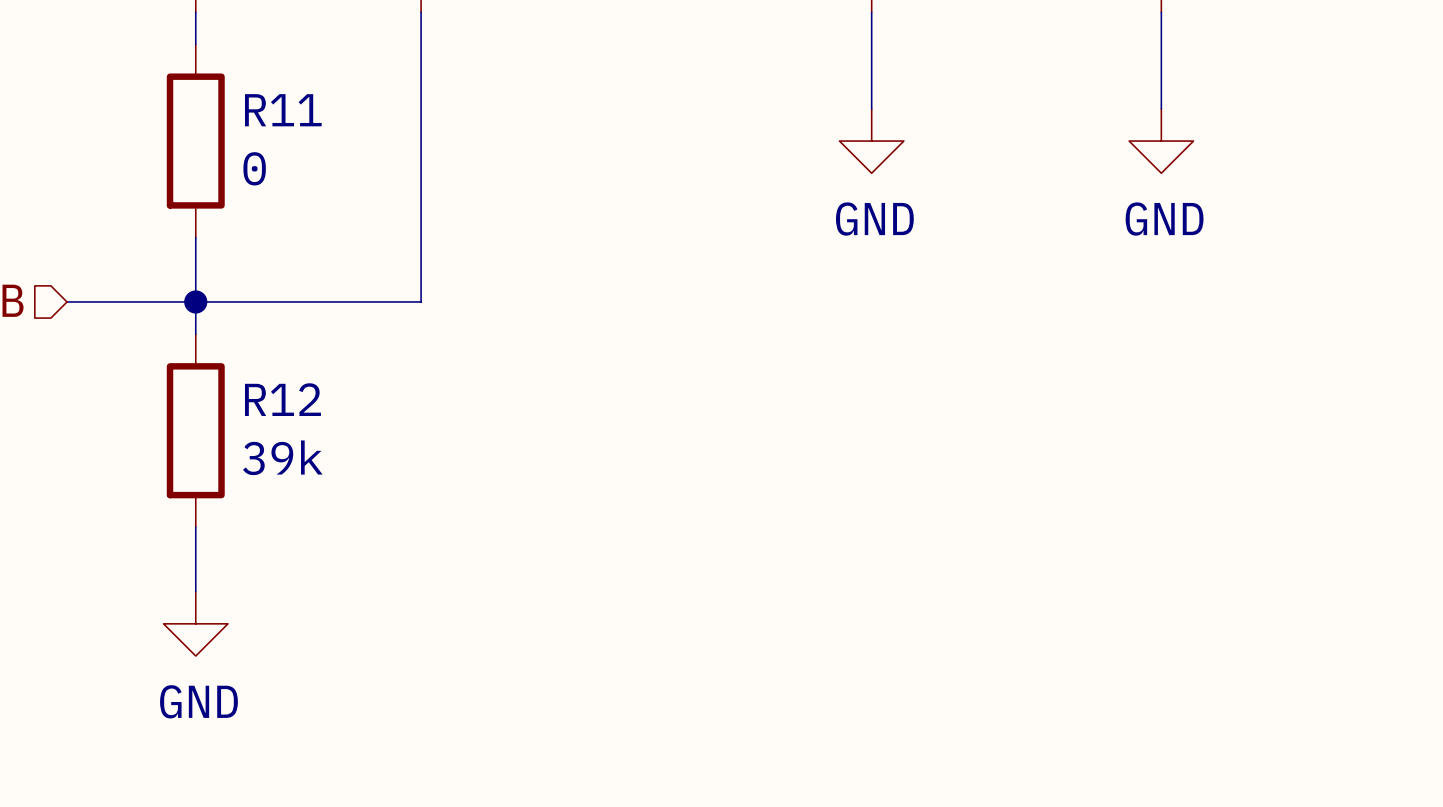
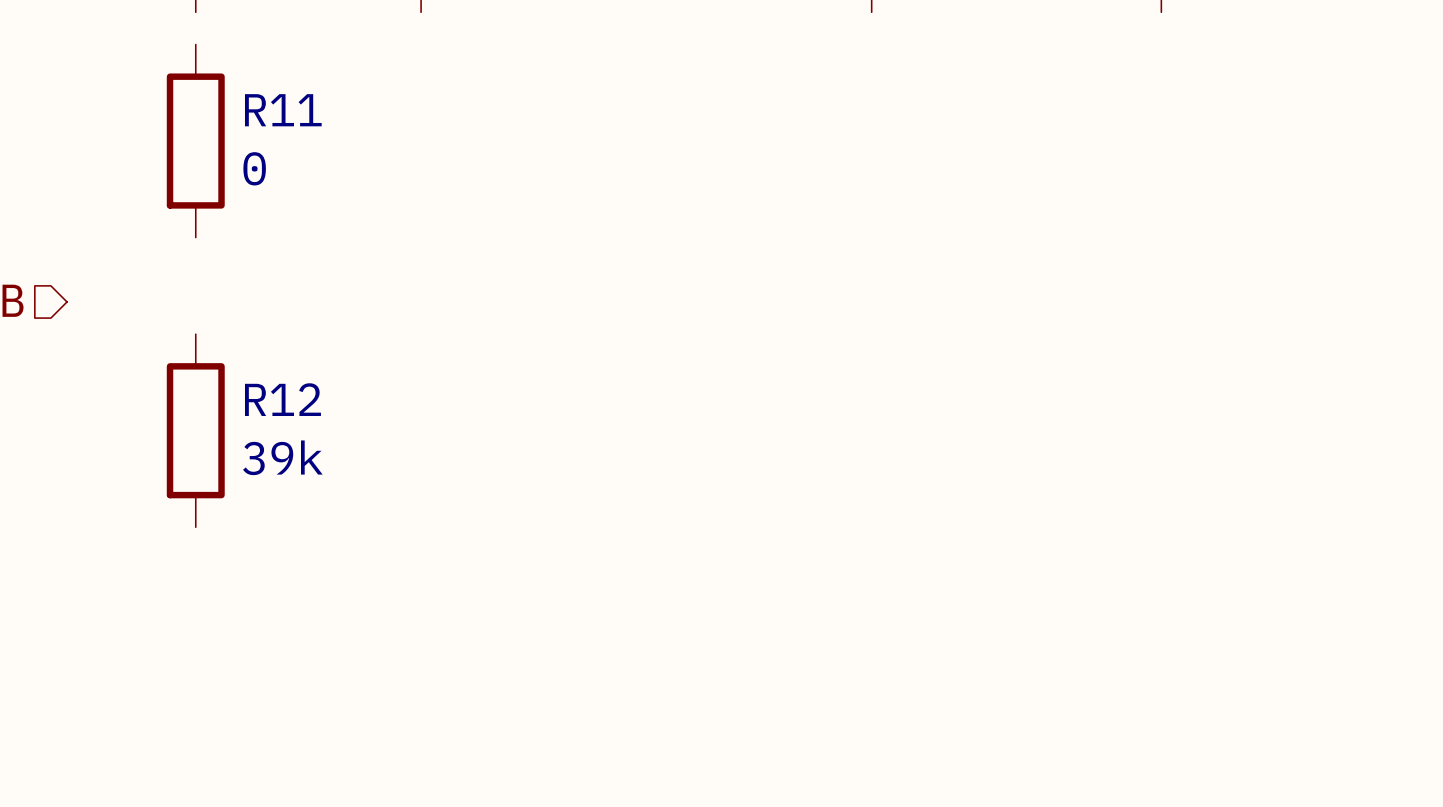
wire: (195, 12) (195, 44) -> none
wire: (421, 12) (421, 301) (67, 301) -> none
wire: (871, 12) (871, 108) -> none
wire: (1161, 12) (1161, 108) -> none
power symbol: GND (871, 141) -> none
power symbol: GND (1161, 141) -> none
wire: (195, 237) (195, 334) -> none
junction: (195, 301) -> none
wire: (195, 527) (195, 591) -> none
power symbol: GND (195, 623) -> none

